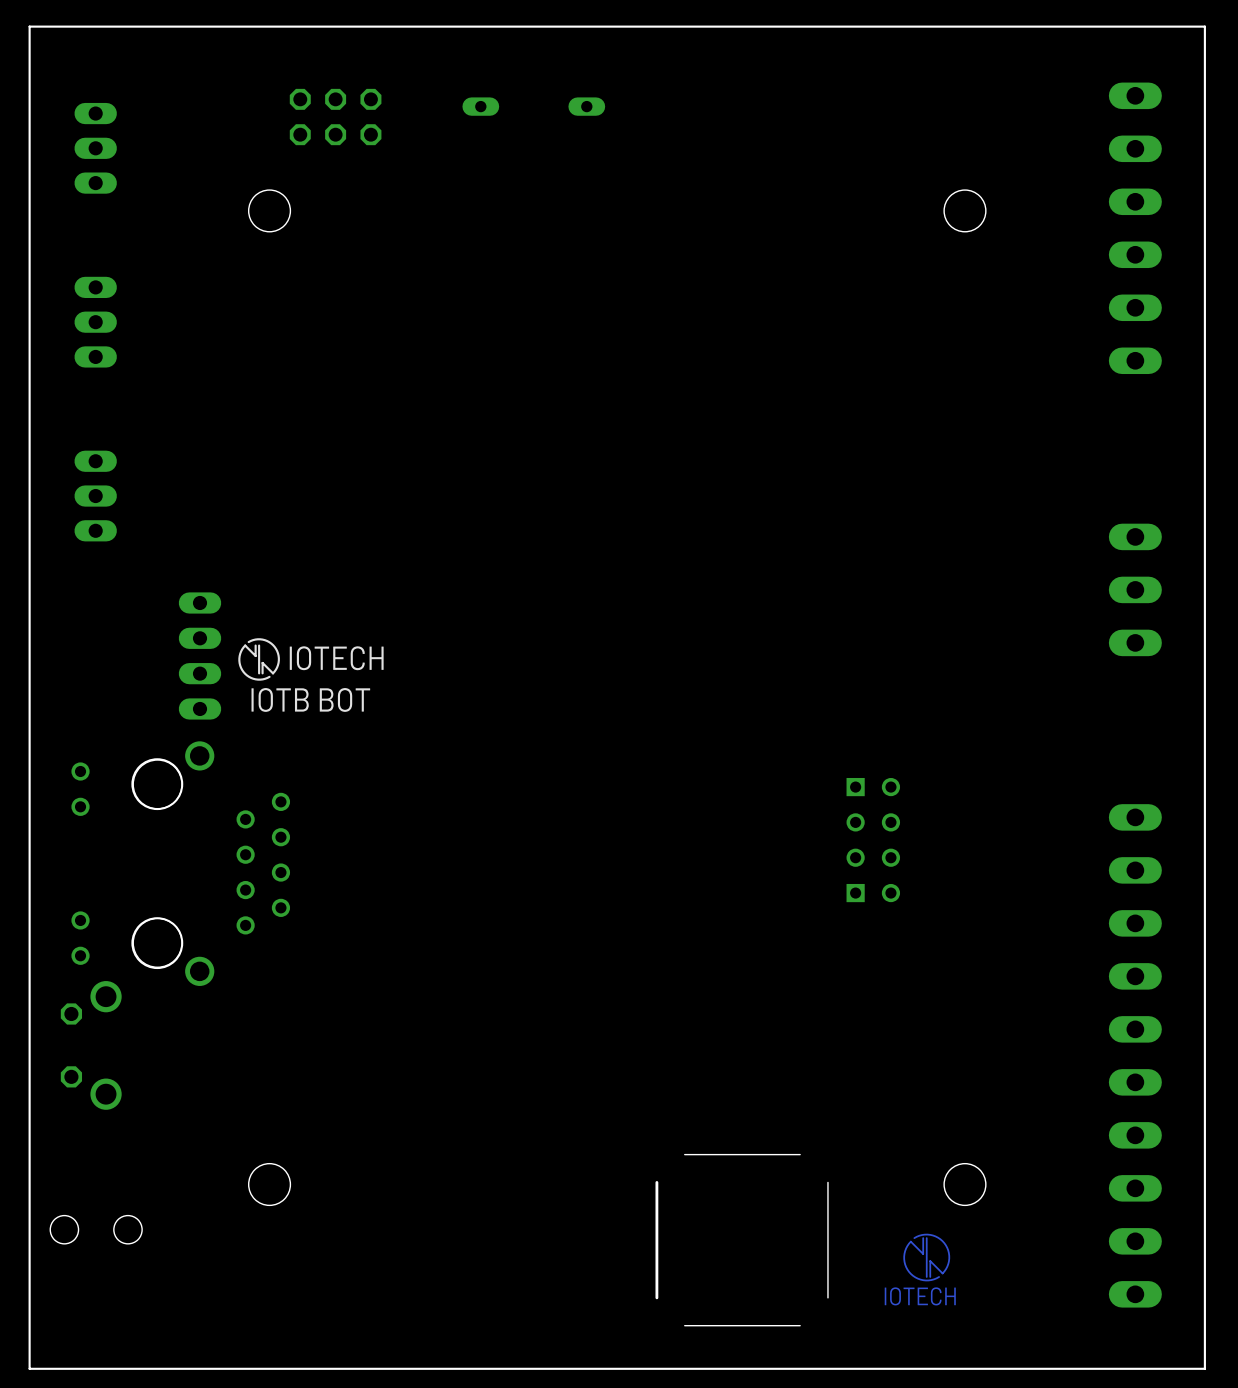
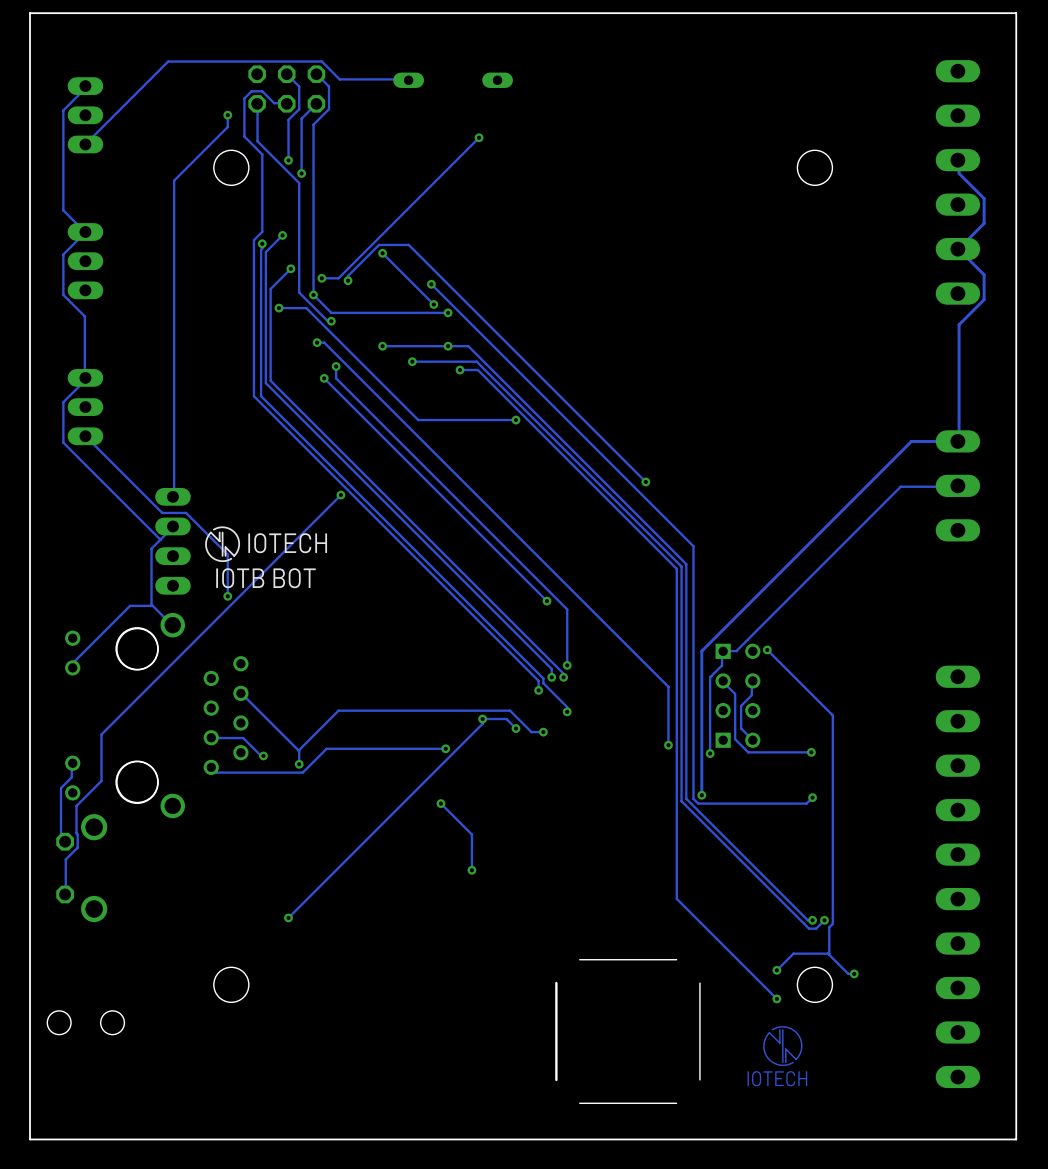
track: none -> (286, 74) (299, 86) (299, 109) (288, 119) (288, 160)
track: none -> (316, 74) (329, 86) (329, 109) (313, 124) (313, 294) (331, 312) (448, 312)
track: none -> (408, 80) (339, 79) (321, 61) (168, 61) (85, 144)
track: none -> (85, 86) (63, 110) (63, 210) (85, 232) (63, 254) (63, 294) (84, 316) (85, 377) (63, 402) (63, 442) (160, 539)
track: none -> (257, 103) (257, 141) (299, 183) (299, 292) (327, 321) (331, 321)
track: none -> (286, 103) (274, 103) (262, 91) (251, 91) (244, 98) (244, 136) (262, 154) (262, 231) (253, 240) (253, 396) (538, 680) (538, 690)
track: none -> (316, 103) (301, 118) (301, 173)
track: none -> (227, 115) (227, 127) (174, 180) (172, 496)
via: none -> (227, 115)
track: none -> (479, 137) (338, 278) (321, 278)
via: none -> (479, 137)
track: none -> (957, 160) (959, 173) (984, 198) (984, 223) (957, 249) (984, 274) (984, 299) (959, 324) (959, 440) (911, 441) (701, 651) (701, 795)
via: none -> (288, 160)
via: none -> (301, 173)
track: none -> (282, 235) (265, 252) (265, 383) (551, 668) (551, 677)
via: none -> (282, 235)
track: none -> (262, 243) (261, 396) (543, 678) (543, 683) (567, 707) (567, 711)
via: none -> (262, 243)
track: none -> (382, 253) (433, 304)
via: none -> (382, 253)
track: none -> (290, 268) (270, 289) (270, 380) (563, 673) (563, 677)
via: none -> (290, 268)
via: none -> (321, 278)
track: none -> (348, 280) (348, 275) (379, 244) (408, 244) (645, 481)
via: none -> (348, 280)
track: none -> (431, 284) (693, 546) (693, 798) (698, 803) (806, 803) (812, 797)
via: none -> (431, 284)
via: none -> (313, 294)
via: none -> (433, 304)
track: none -> (278, 308) (306, 308) (418, 420) (516, 420)
via: none -> (278, 308)
via: none -> (448, 312)
via: none -> (331, 321)
track: none -> (317, 342) (324, 342) (668, 686) (668, 745)
via: none -> (317, 342)
track: none -> (382, 346) (468, 346) (686, 564) (686, 798) (807, 920) (812, 920)
via: none -> (382, 346)
via: none -> (448, 346)
track: none -> (412, 361) (476, 361) (681, 566) (681, 801) (809, 928) (816, 928) (824, 920)
via: none -> (412, 361)
track: none -> (336, 366) (336, 378) (567, 609) (567, 665)
via: none -> (336, 366)
track: none -> (460, 370) (477, 370) (676, 568) (676, 898) (776, 998)
via: none -> (460, 370)
track: none -> (324, 378) (546, 601)
via: none -> (324, 378)
via: none -> (516, 420)
track: none -> (85, 436) (162, 512) (186, 512) (227, 554) (227, 596)
via: none -> (645, 481)
track: none -> (957, 485) (900, 486) (736, 651) (723, 651)
track: none -> (340, 495) (101, 734) (101, 780) (76, 805) (77, 847) (65, 859) (65, 894)
via: none -> (340, 495)
track: none -> (172, 526) (151, 548) (151, 604) (172, 625)
via: none -> (227, 596)
via: none -> (546, 601)
track: none -> (152, 605) (130, 605) (72, 663) (72, 667)
track: none -> (767, 649) (832, 715) (832, 923) (829, 927) (828, 954)
via: none -> (767, 649)
track: none -> (723, 651) (722, 665) (710, 677) (710, 753)
via: none -> (567, 665)
via: none -> (551, 677)
via: none -> (563, 677)
track: none -> (723, 680) (735, 694) (735, 739) (748, 752) (811, 752)
track: none -> (752, 680) (751, 695) (741, 705) (741, 728) (752, 740)
via: none -> (538, 690)
track: none -> (240, 693) (299, 751) (299, 764)
via: none -> (567, 711)
via: none -> (482, 719)
track: none -> (516, 728) (506, 719) (482, 719) (482, 723) (288, 917)
via: none -> (516, 728)
track: none -> (543, 732) (531, 732) (510, 710) (338, 710) (298, 750)
via: none -> (543, 732)
track: none -> (211, 737) (243, 738) (261, 755) (263, 755)
via: none -> (668, 745)
track: none -> (445, 748) (326, 748) (302, 772) (217, 772) (211, 767)
via: none -> (445, 748)
via: none -> (811, 752)
via: none -> (710, 753)
via: none -> (263, 755)
track: none -> (72, 763) (71, 777) (61, 788) (61, 838) (65, 841)
via: none -> (299, 764)
via: none -> (701, 795)
via: none -> (812, 797)
track: none -> (440, 803) (471, 834) (471, 870)
via: none -> (440, 803)
via: none -> (471, 870)
via: none -> (288, 917)
via: none -> (812, 920)
via: none -> (824, 920)
track: none -> (776, 970) (793, 953) (828, 953) (848, 973) (854, 973)
via: none -> (776, 970)
via: none -> (854, 973)
via: none -> (776, 998)

